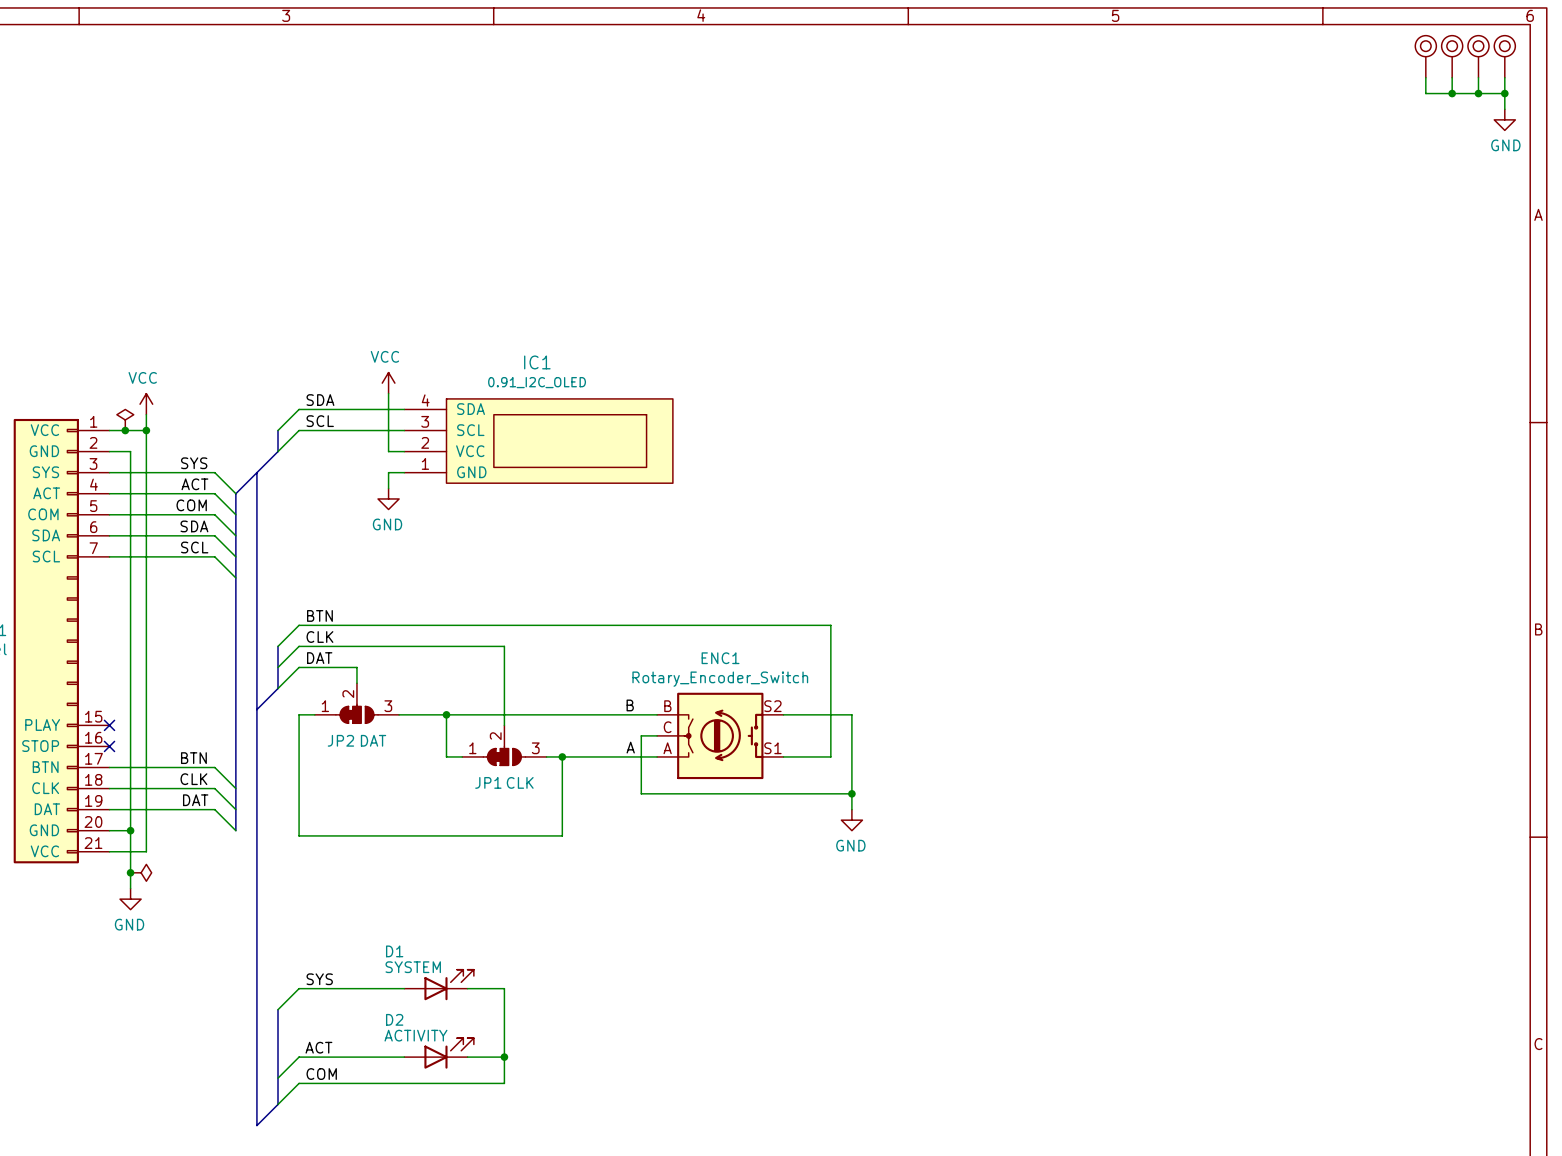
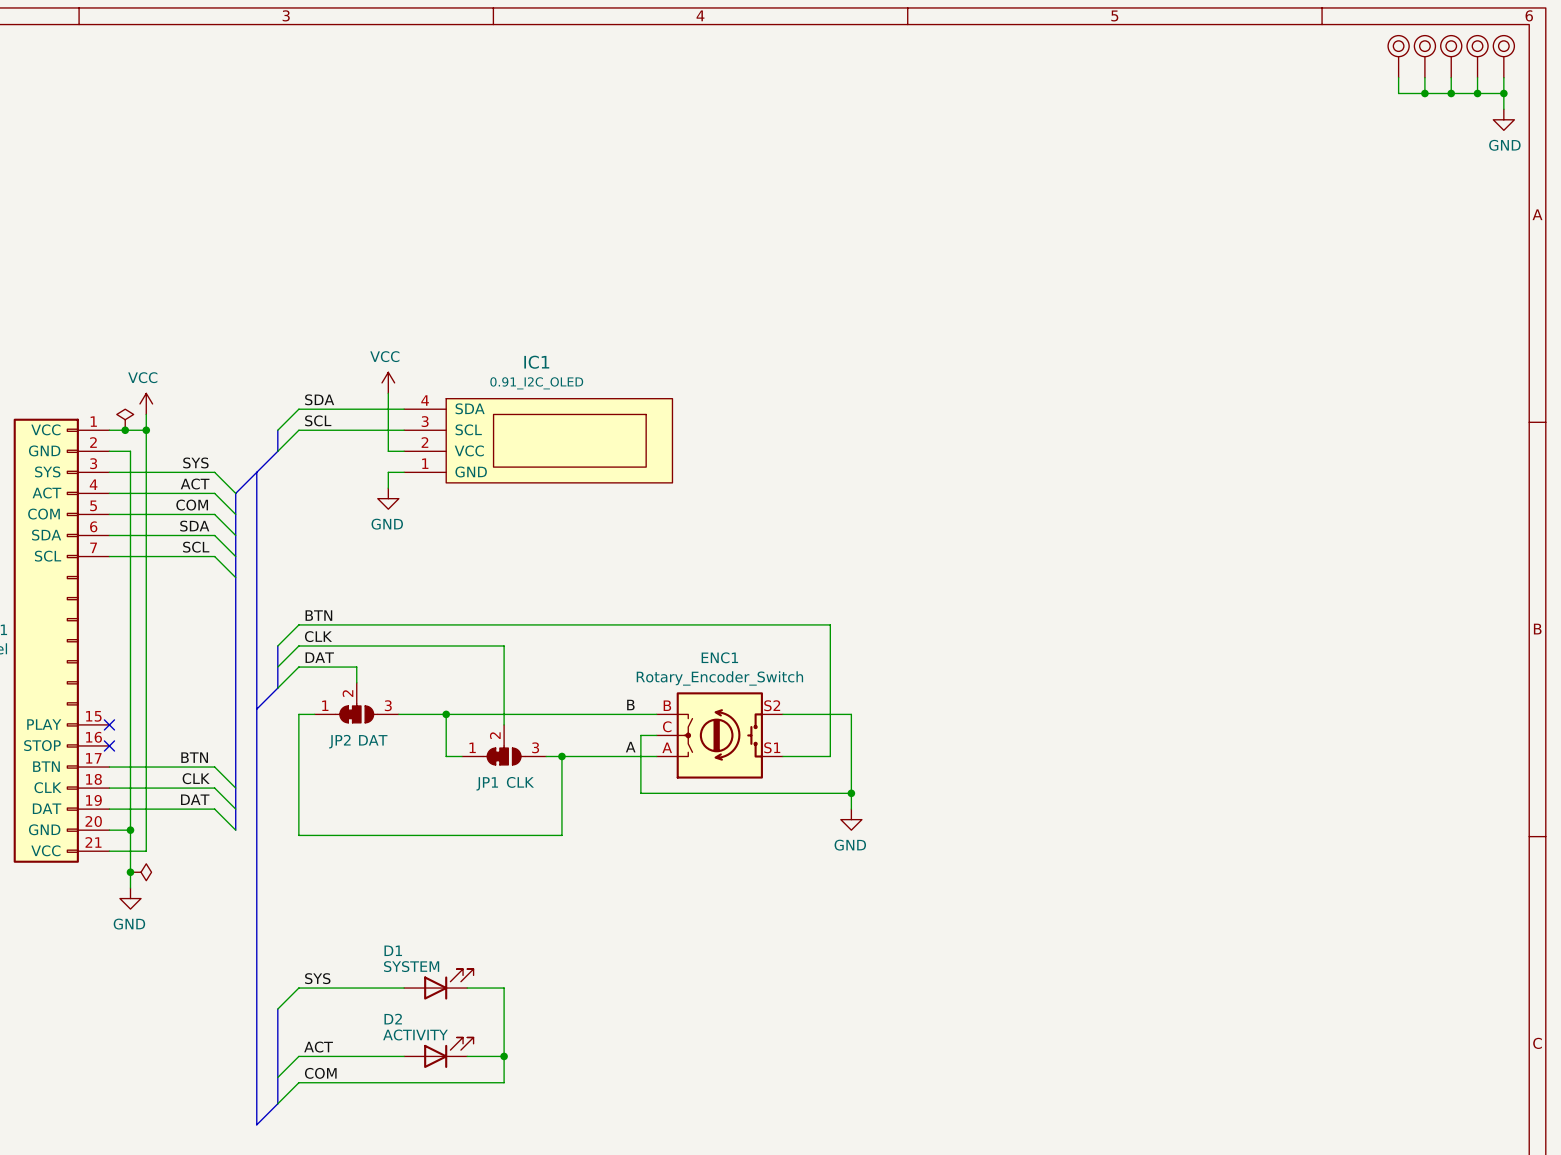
part: none -> (1398, 56)
wire: none -> (1398, 77) (1398, 93) (1424, 93)
junction: none -> (1424, 93)

